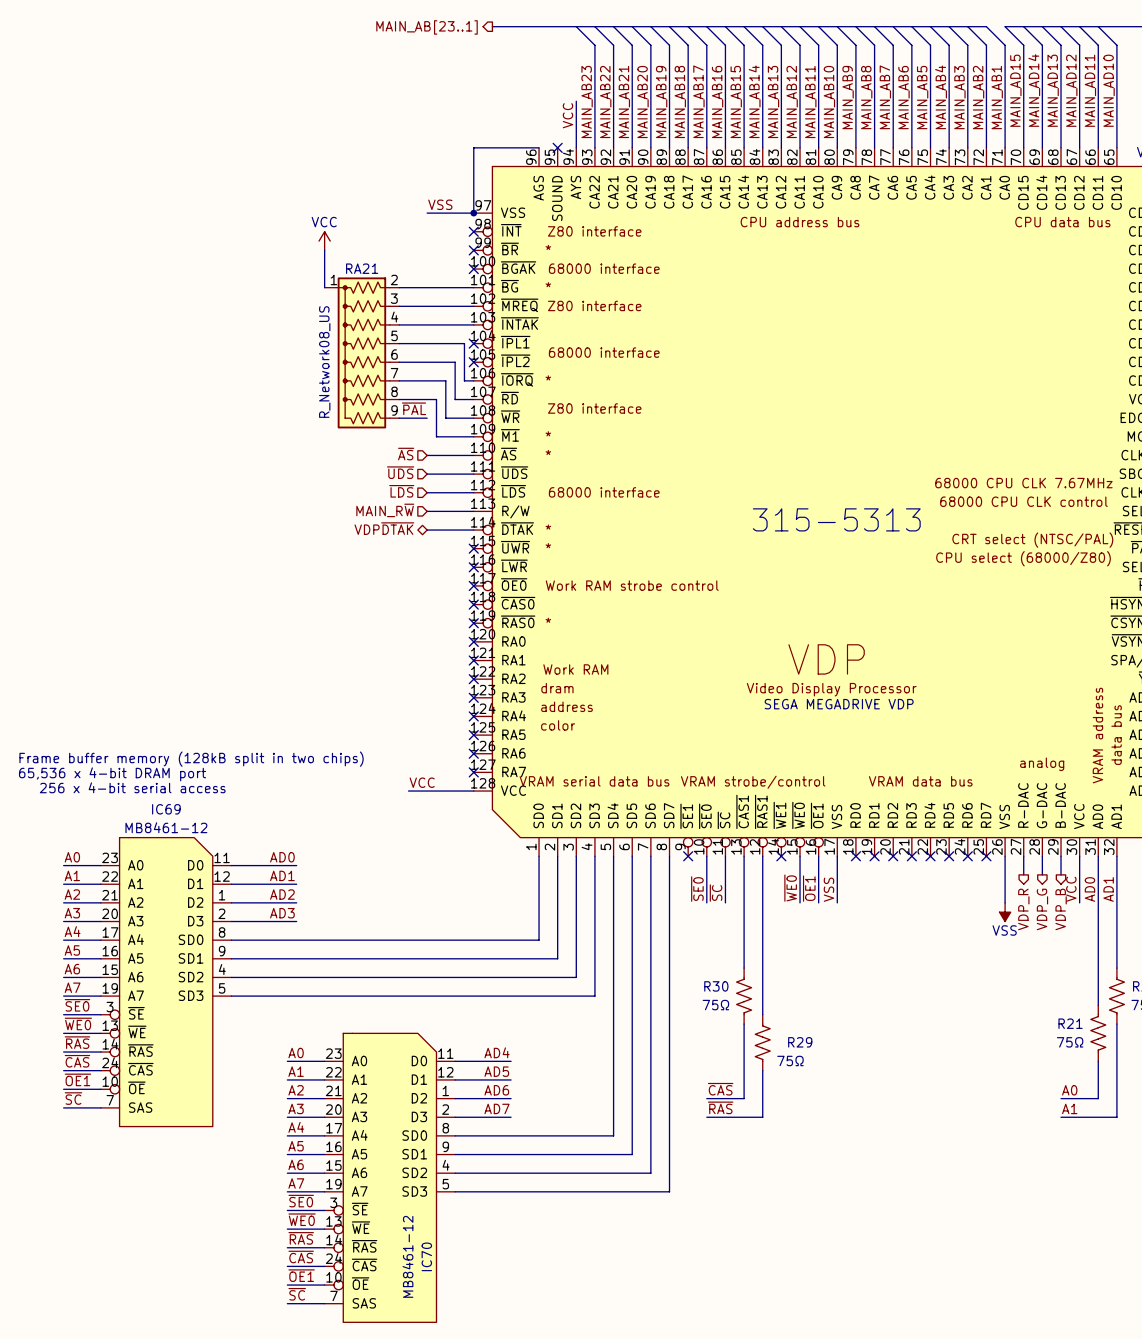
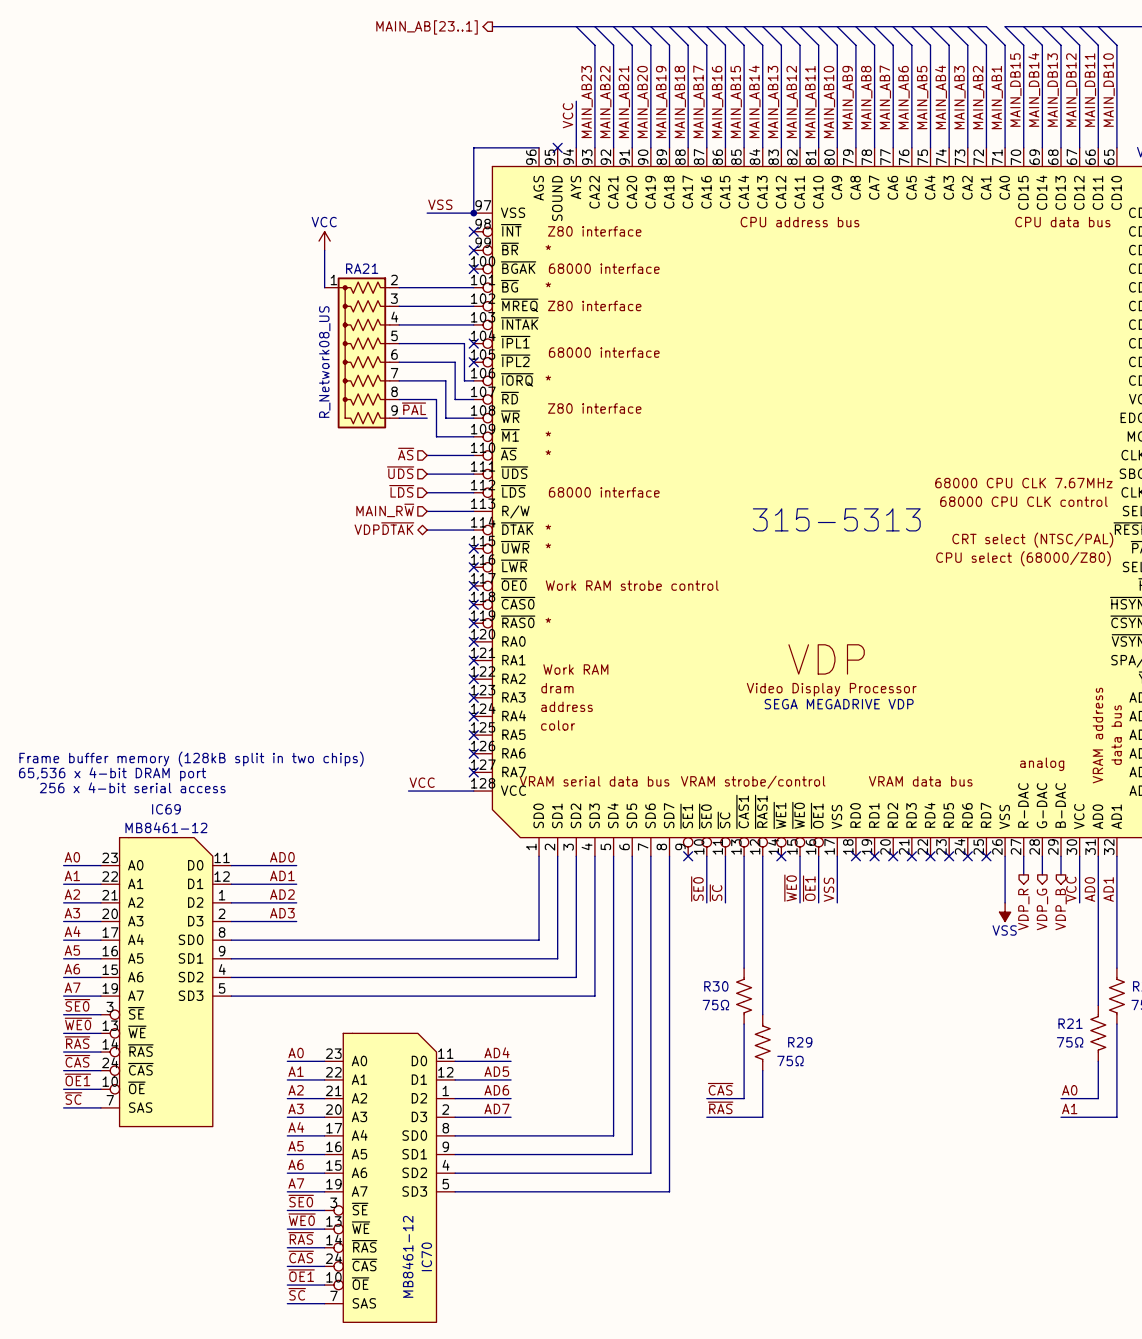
label: MAIN_AD15 (1015, 90) -> MAIN_DB15 (1015, 90)
label: MAIN_AD14 (1034, 90) -> MAIN_DB14 (1034, 89)
label: MAIN_AD13 (1053, 90) -> MAIN_DB13 (1053, 90)
label: MAIN_AD12 (1071, 90) -> MAIN_DB12 (1071, 90)
label: MAIN_AD11 (1090, 90) -> MAIN_DB11 (1090, 90)
label: MAIN_AD10 (1109, 90) -> MAIN_DB10 (1109, 90)

